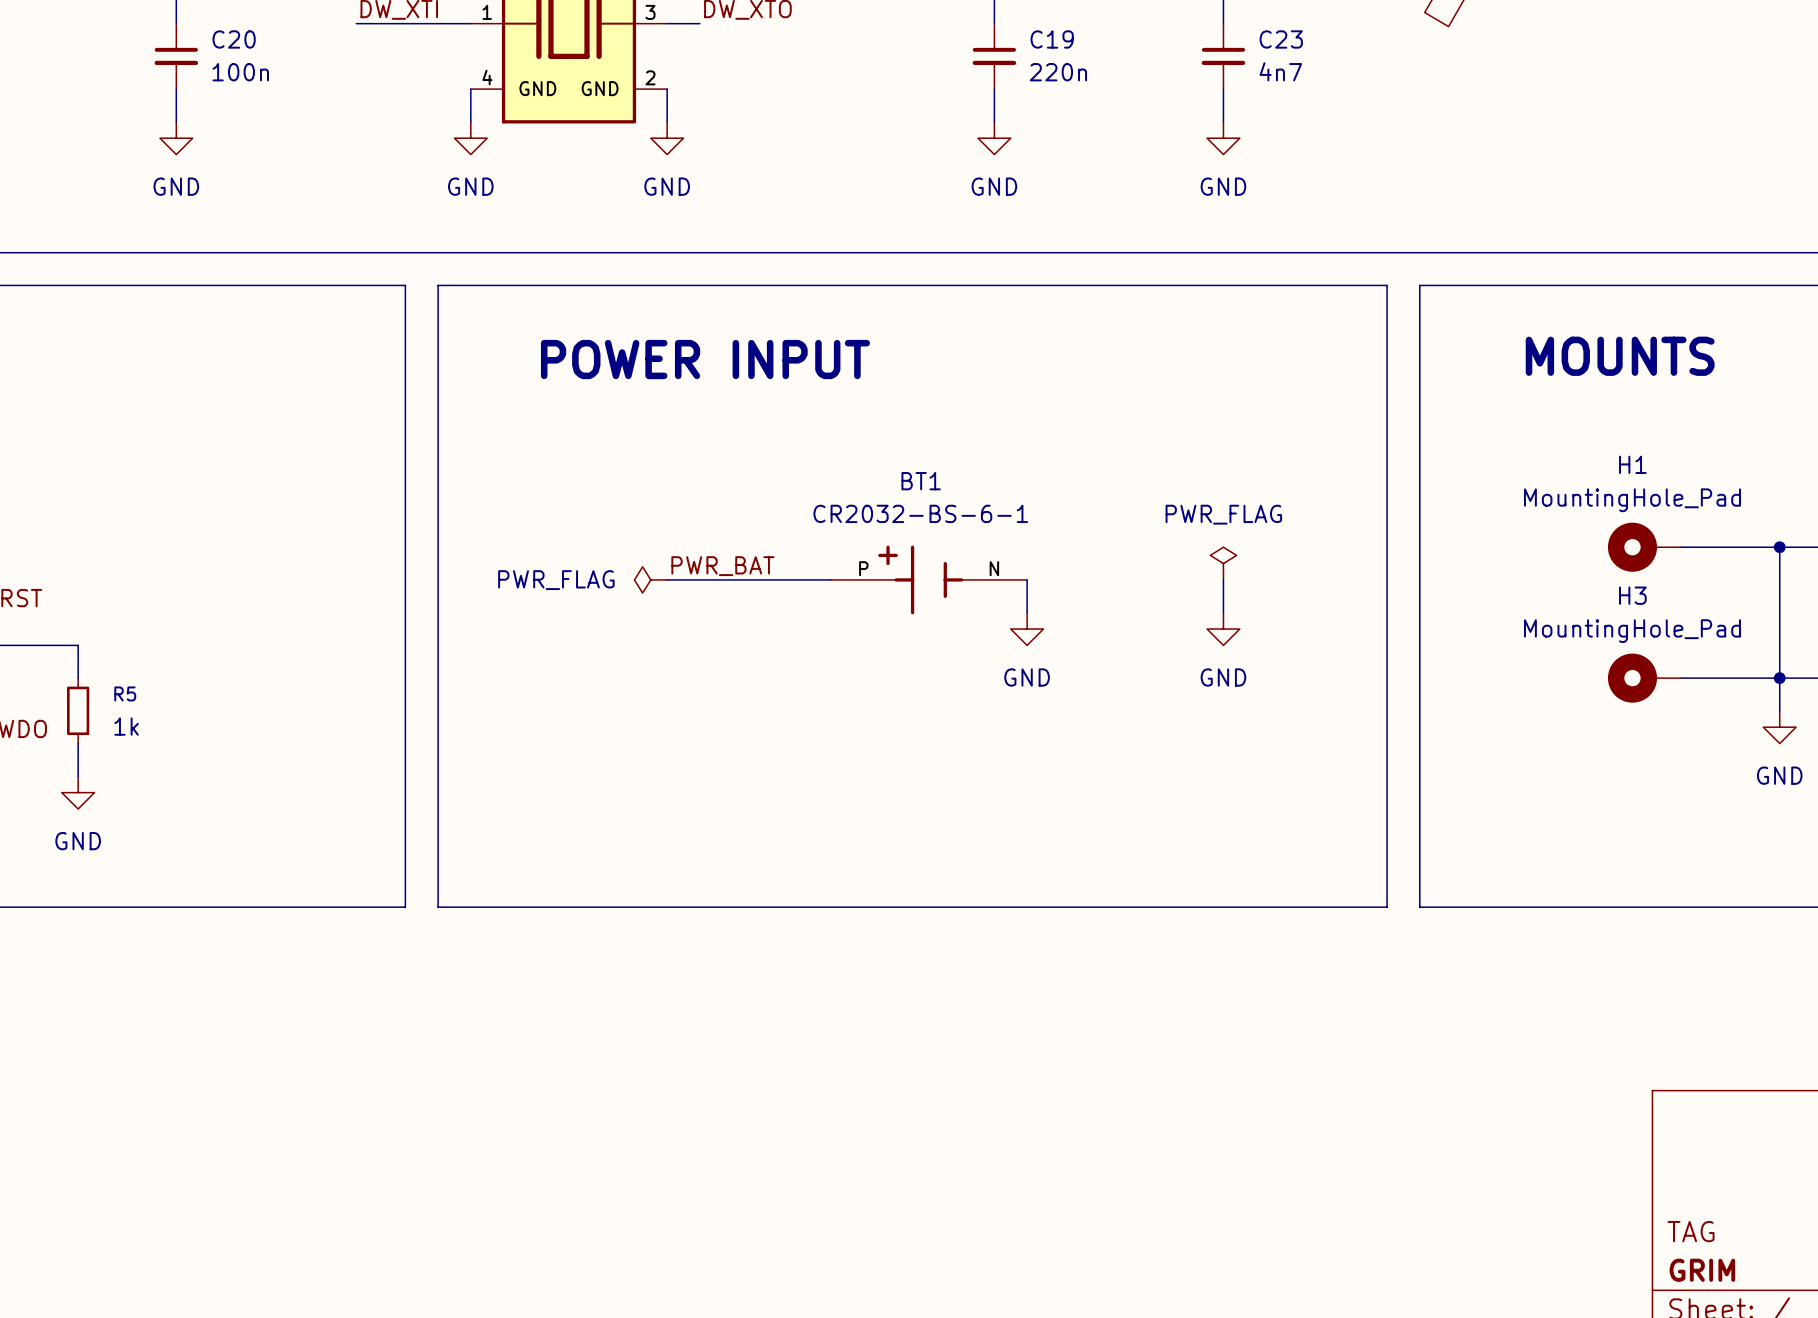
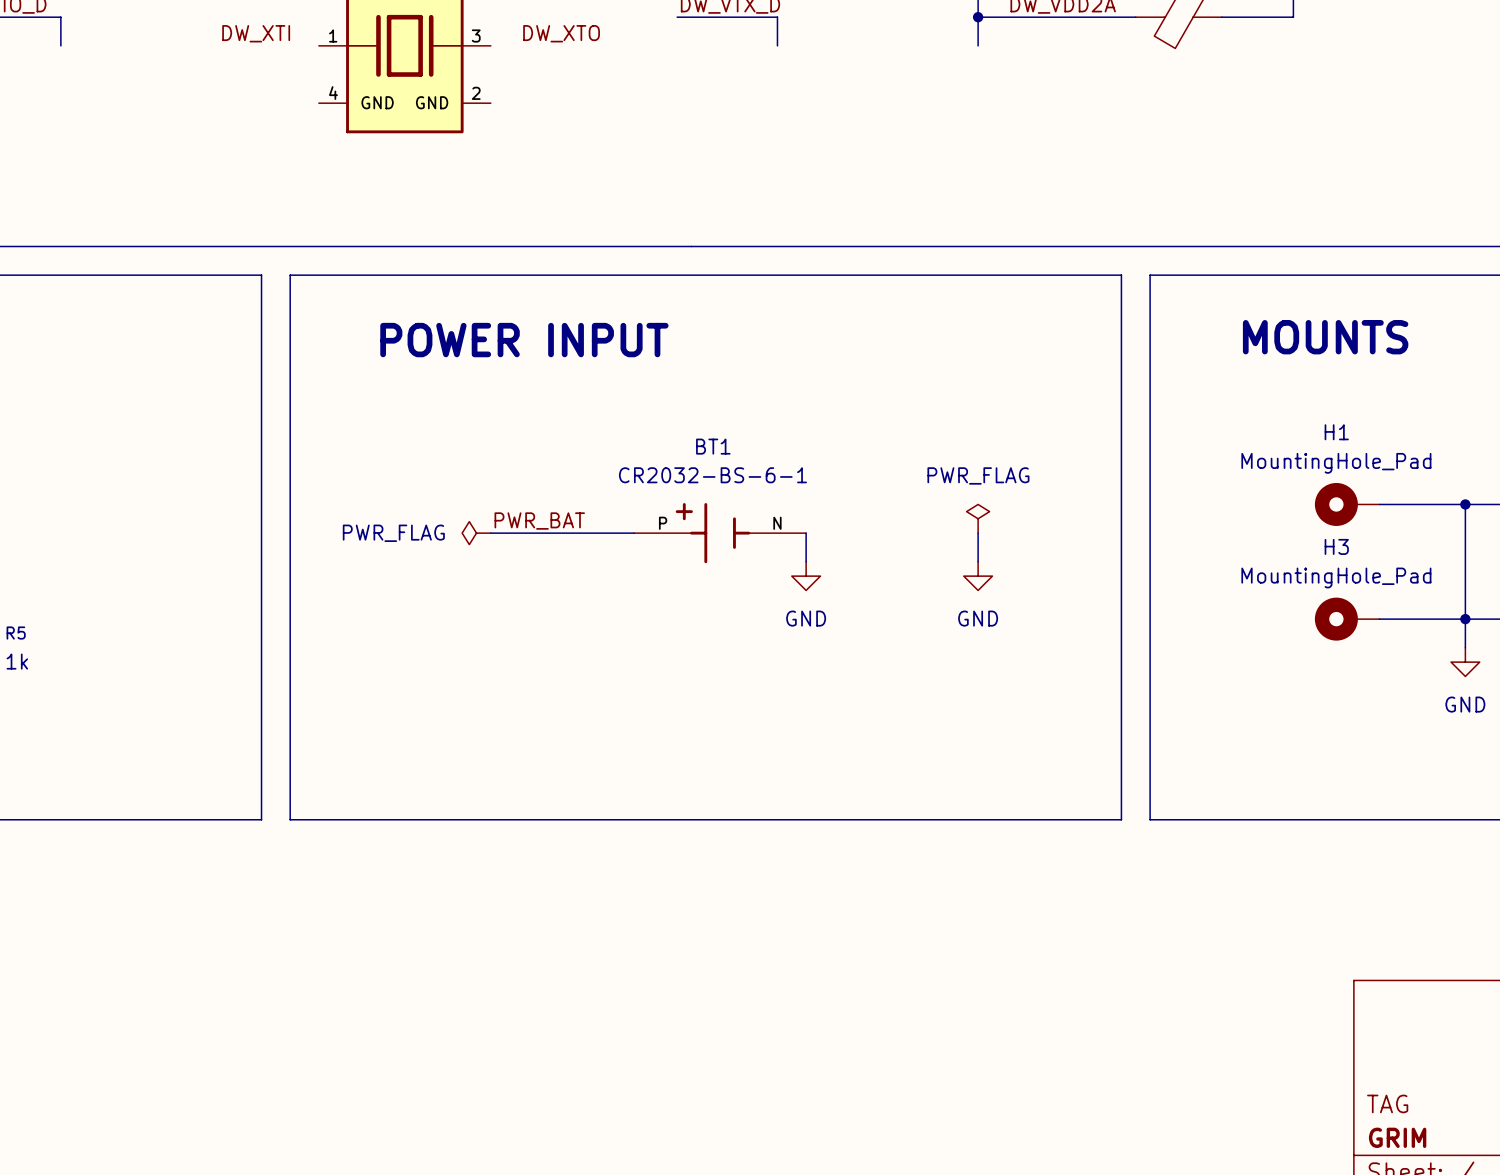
wire: (356, 23) (470, 23) -> none
wire: (667, 23) (699, 23) -> none
C20: 100n (176, 56) -> none
C19: 220n (994, 56) -> none
C23: 4n7 (1223, 56) -> none
wire: (176, 89) (176, 121) -> none
wire: (470, 89) (470, 121) -> none
wire: (667, 89) (667, 121) -> none
wire: (994, 89) (994, 121) -> none
wire: (1223, 89) (1223, 121) -> none
power symbol: GND (176, 138) -> none
power symbol: GND (470, 138) -> none
power symbol: GND (667, 138) -> none
power symbol: GND (994, 138) -> none
power symbol: GND (1223, 138) -> none

